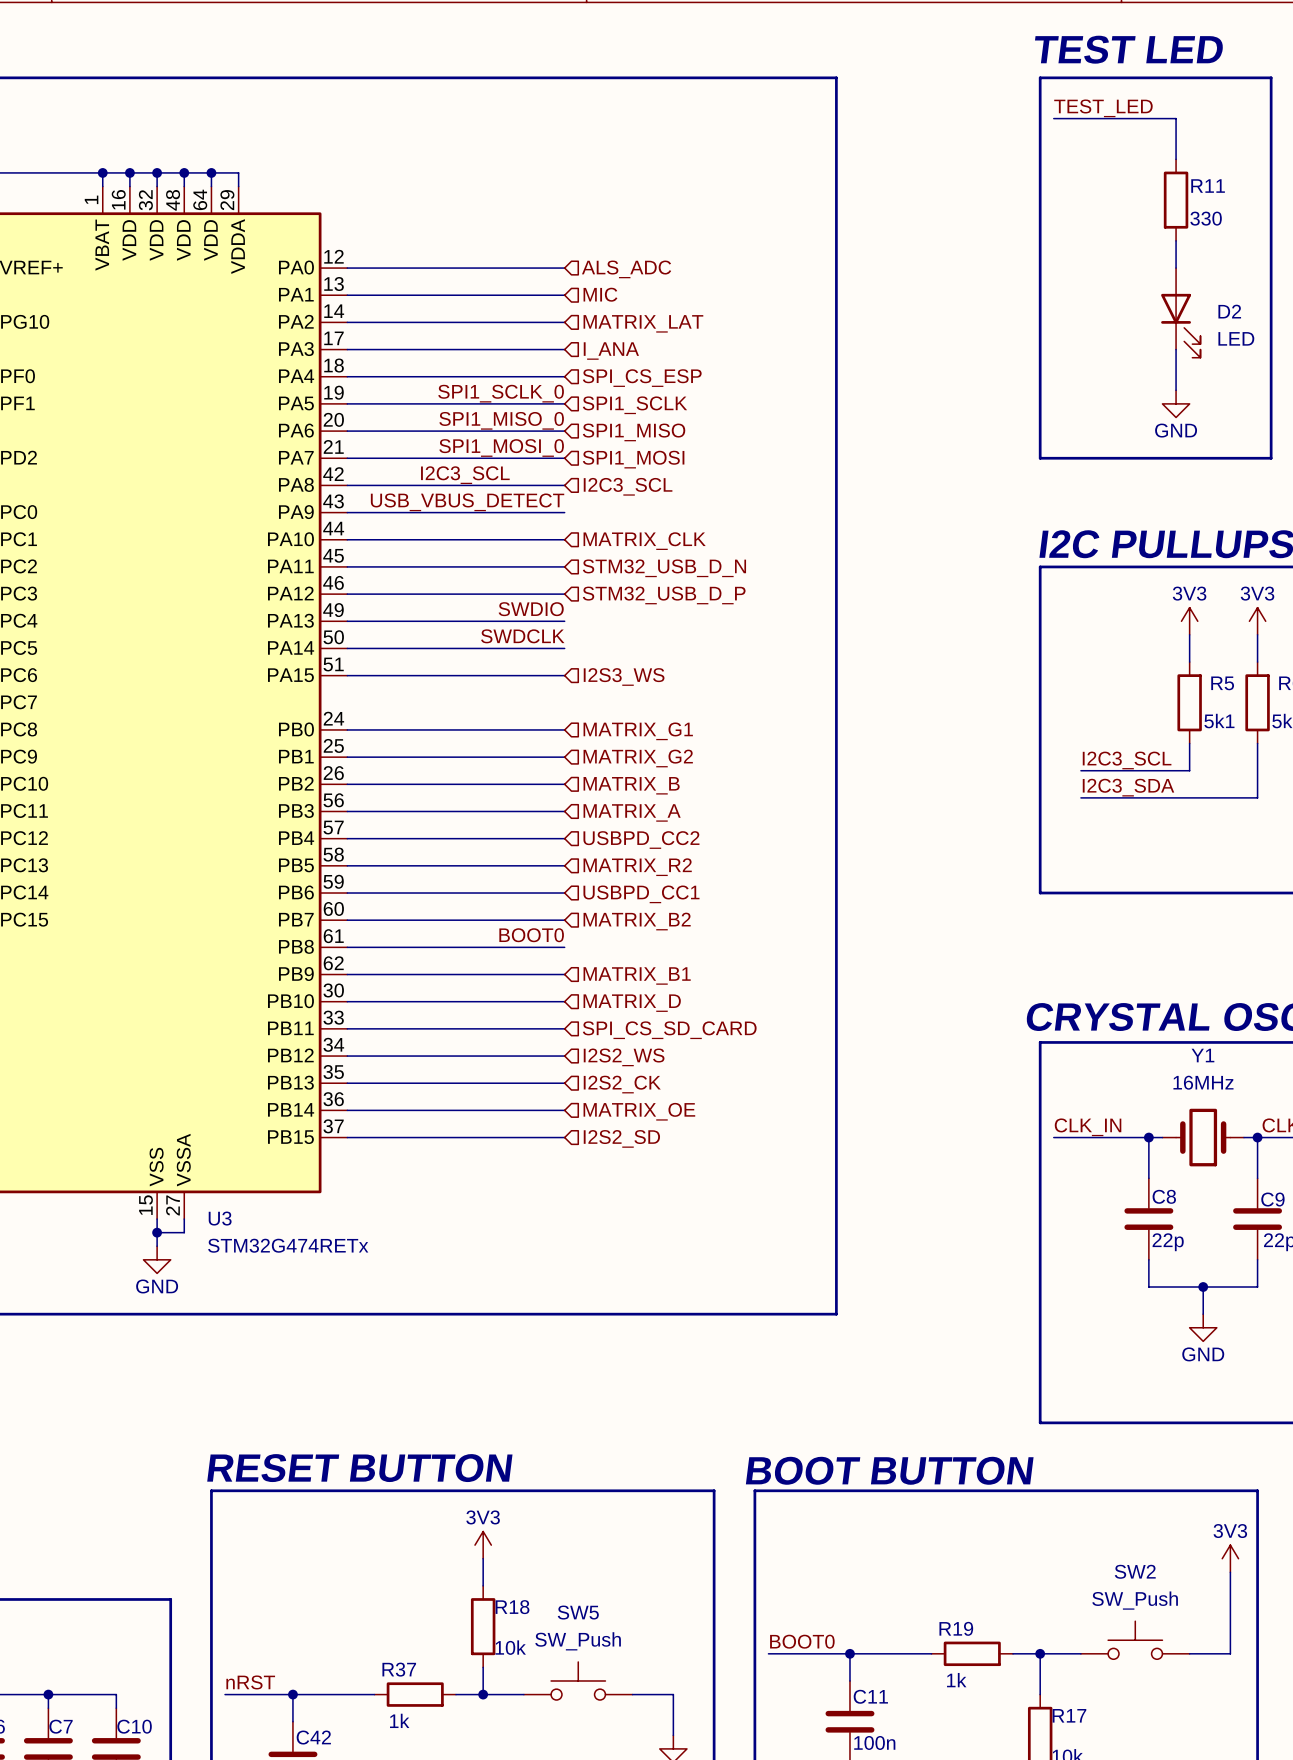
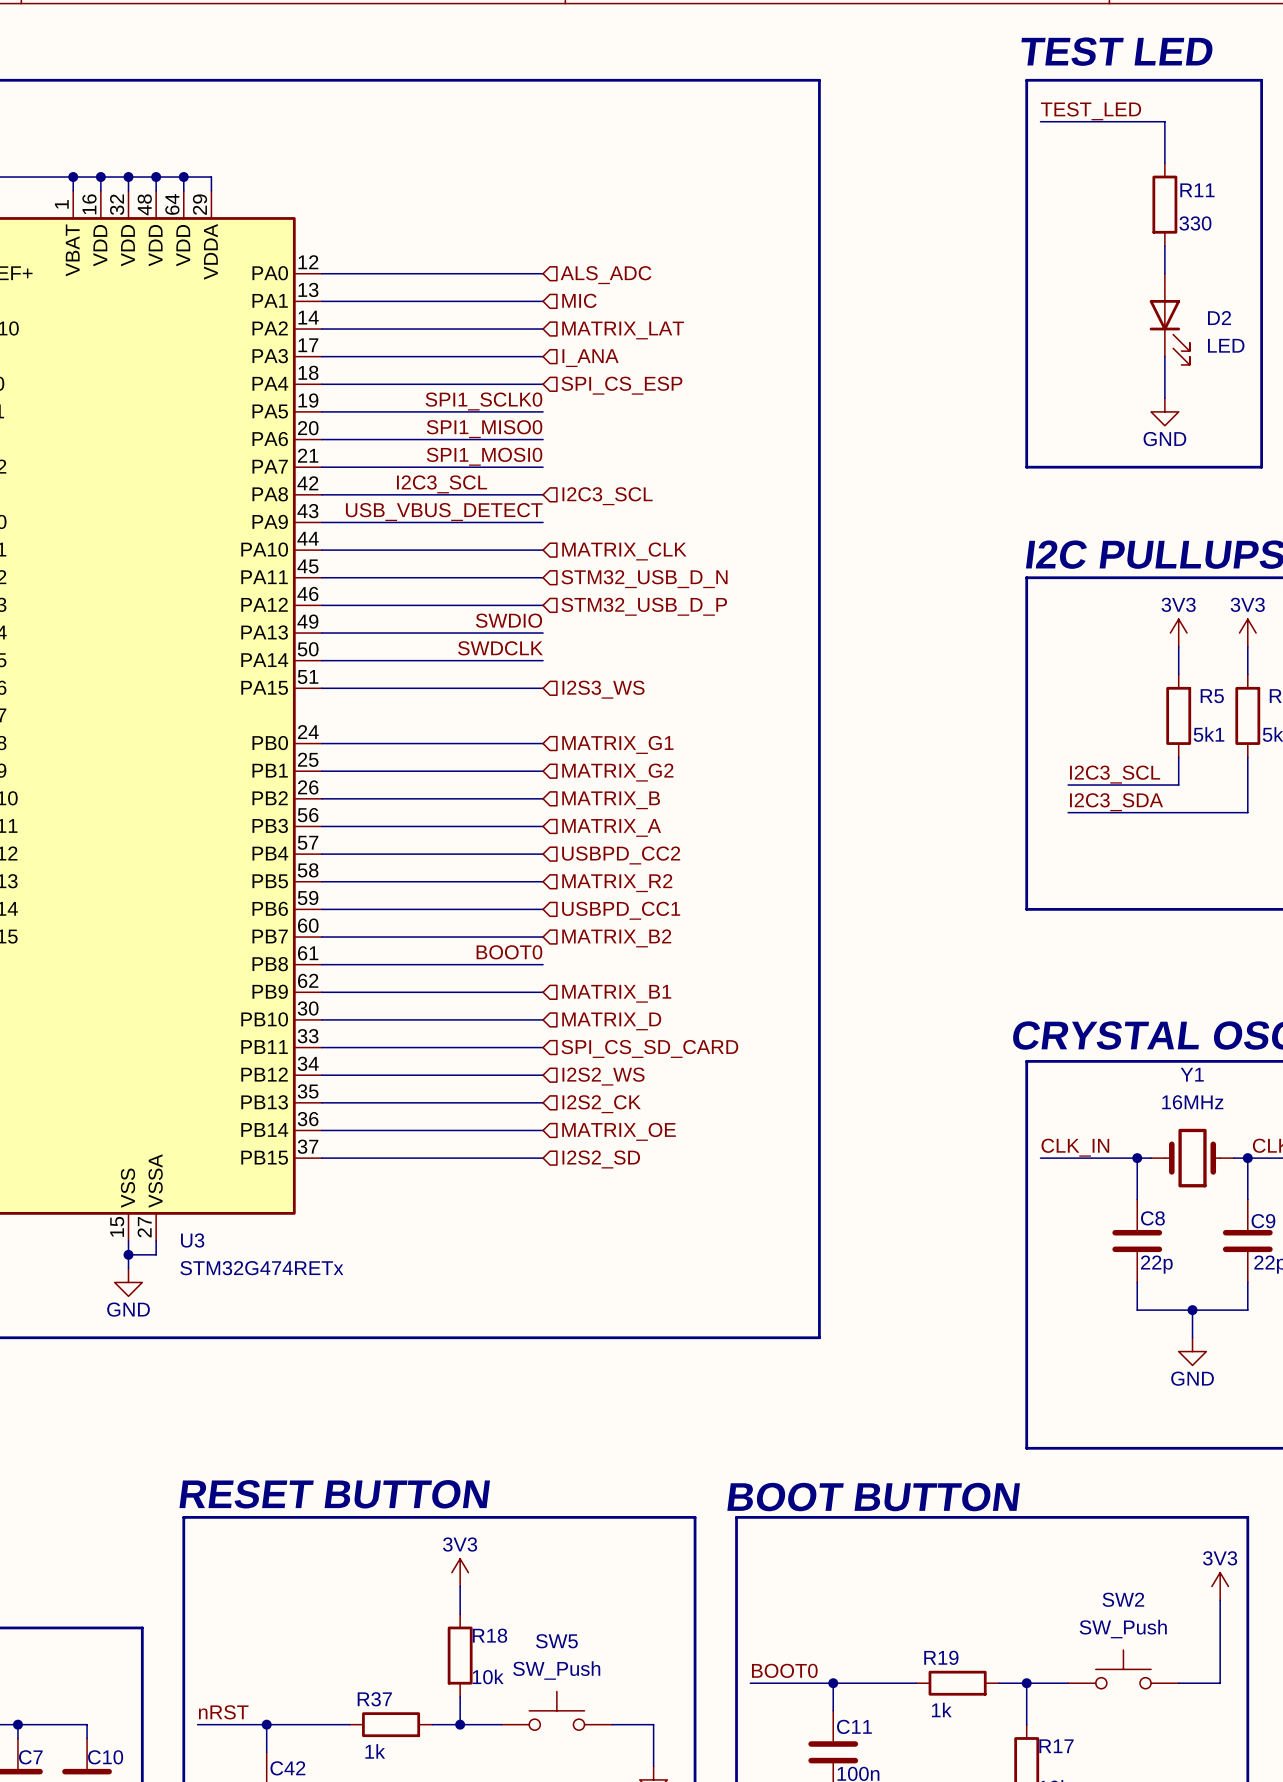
label: SPI1_SCLK_0 (501, 393) -> SPI1_SCLK0 (483, 401)
hierarchical label: SPI1_SCLK (634, 405) -> none
label: SPI1_MISO_0 (501, 420) -> SPI1_MISO0 (484, 429)
hierarchical label: SPI1_MISO (634, 432) -> none
label: SPI1_MOSI_0 (501, 447) -> SPI1_MOSI0 (484, 456)
hierarchical label: SPI1_MOSI (633, 459) -> none

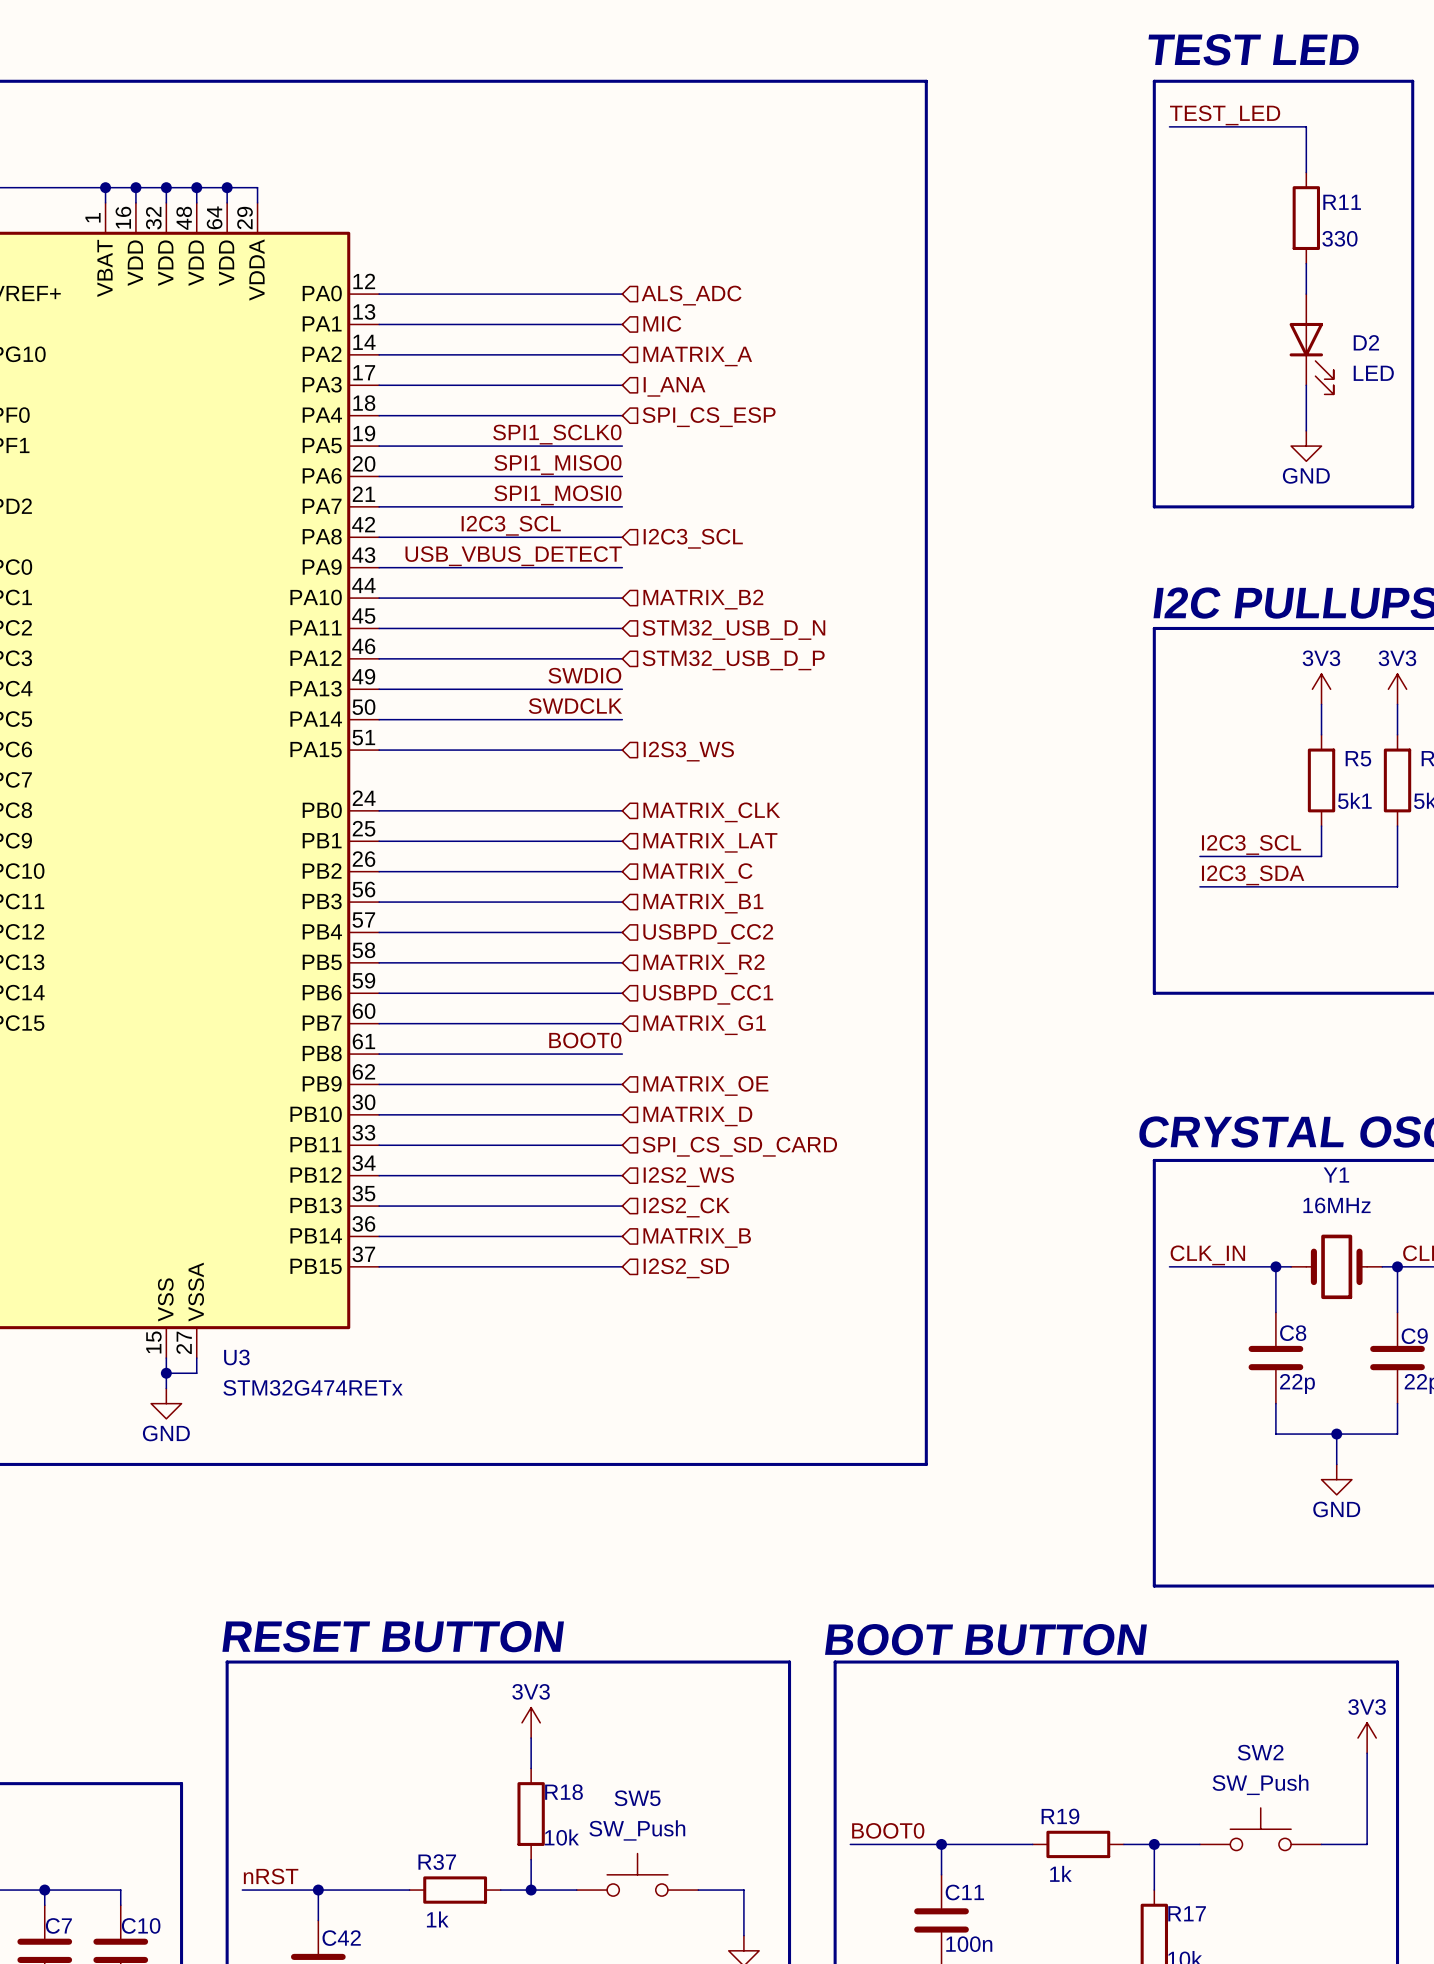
hierarchical label: MATRIX_LAT (623, 330) -> MATRIX_A (697, 356)
hierarchical label: MATRIX_CLK (624, 551) -> MATRIX_B2 (703, 599)
hierarchical label: MATRIX_G1 (617, 744) -> MATRIX_CLK (711, 812)
hierarchical label: MATRIX_G2 (617, 772) -> MATRIX_LAT (710, 842)
hierarchical label: MATRIX_B (611, 800) -> MATRIX_C (697, 873)
hierarchical label: MATRIX_A (611, 827) -> MATRIX_B1 (703, 903)
hierarchical label: MATRIX_B2 (616, 938) -> MATRIX_G1 (704, 1025)
hierarchical label: MATRIX_B1 (616, 993) -> MATRIX_OE (705, 1085)
hierarchical label: MATRIX_OE (619, 1131) -> MATRIX_B (697, 1238)

